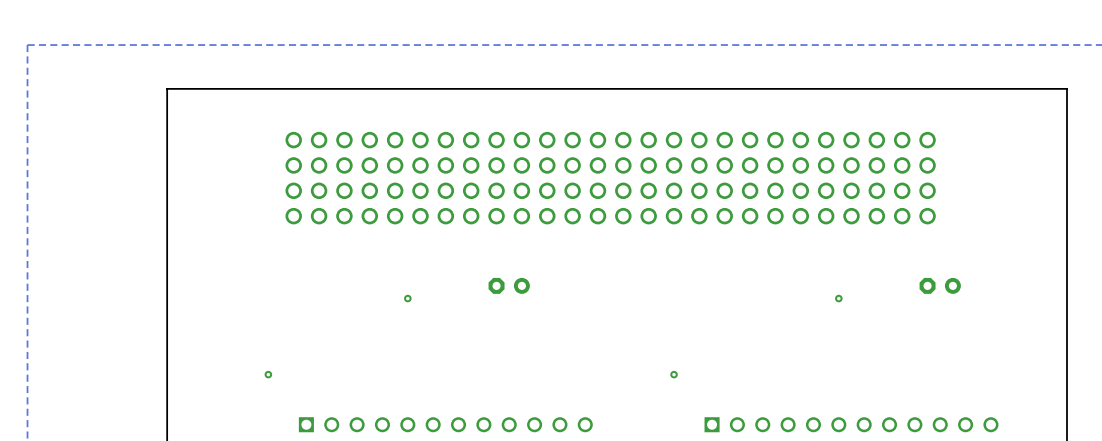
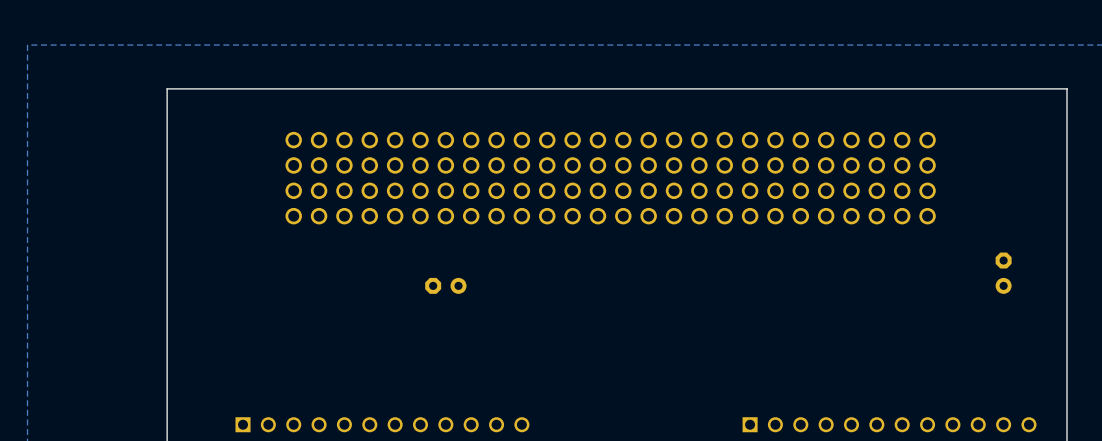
part position: (509, 285) -> (445, 285)
part rotation: 0° (940, 285) -> 90° clockwise (1003, 273)
part position: (940, 285) -> (1003, 273)
via: (407, 298) -> none
via: (838, 298) -> none
via: (268, 374) -> none
via: (674, 374) -> none
part position: (445, 424) -> (382, 424)
part position: (851, 424) -> (889, 424)

